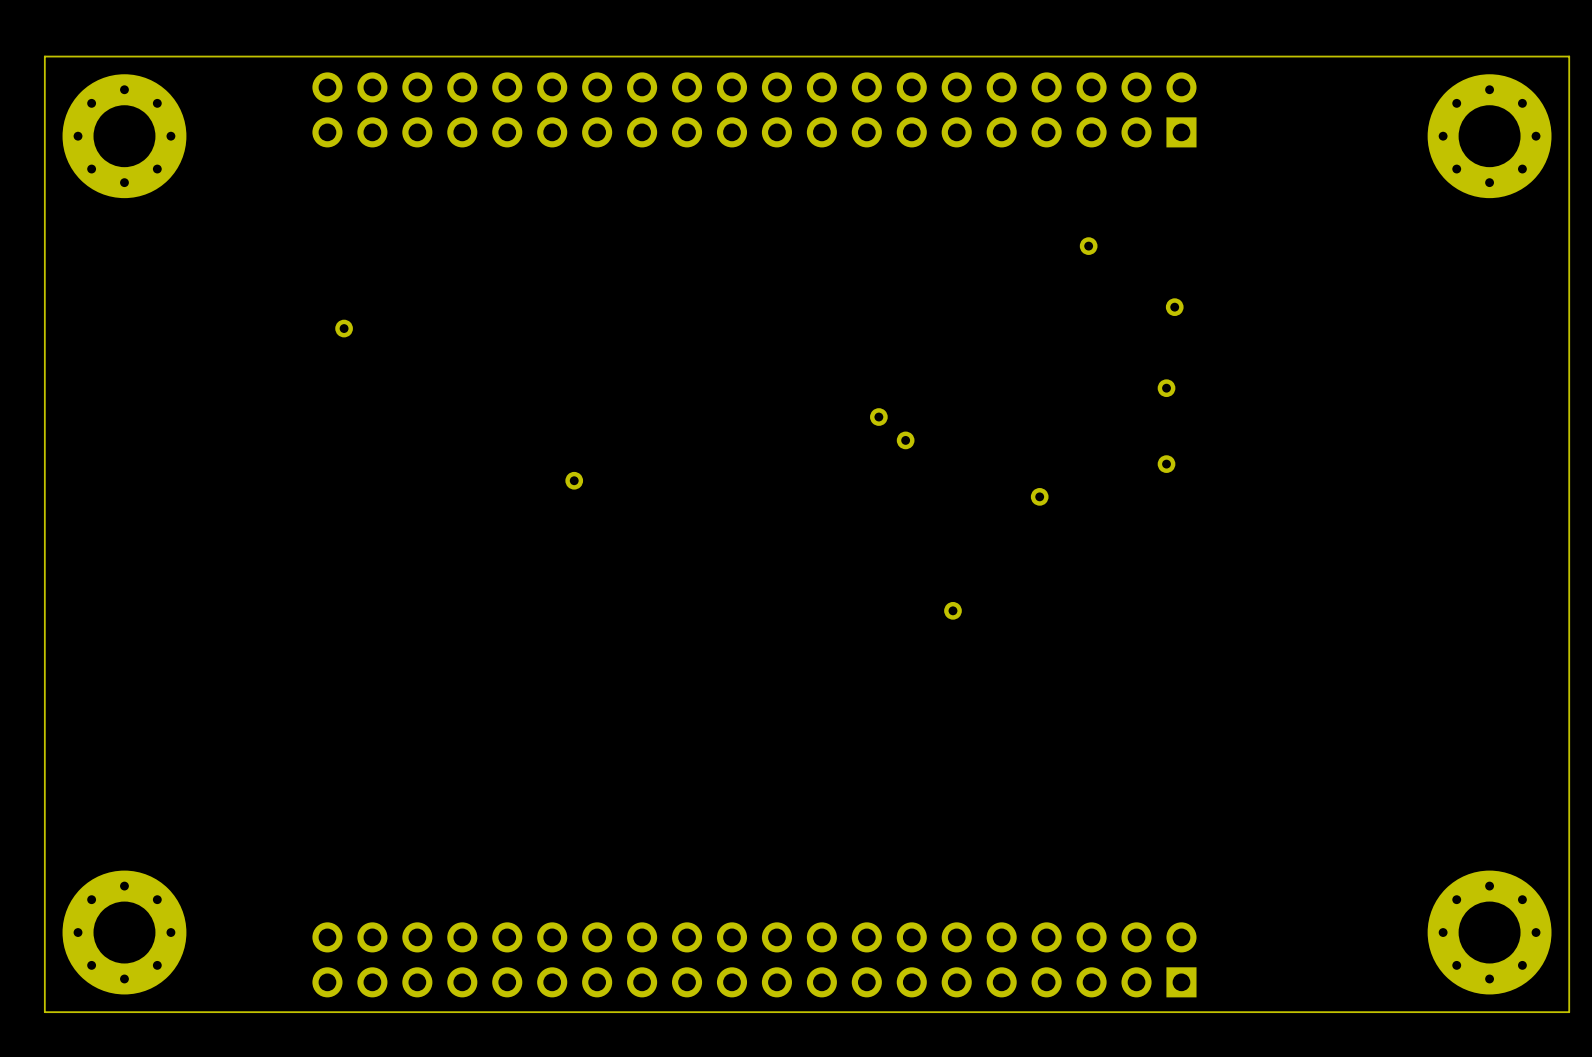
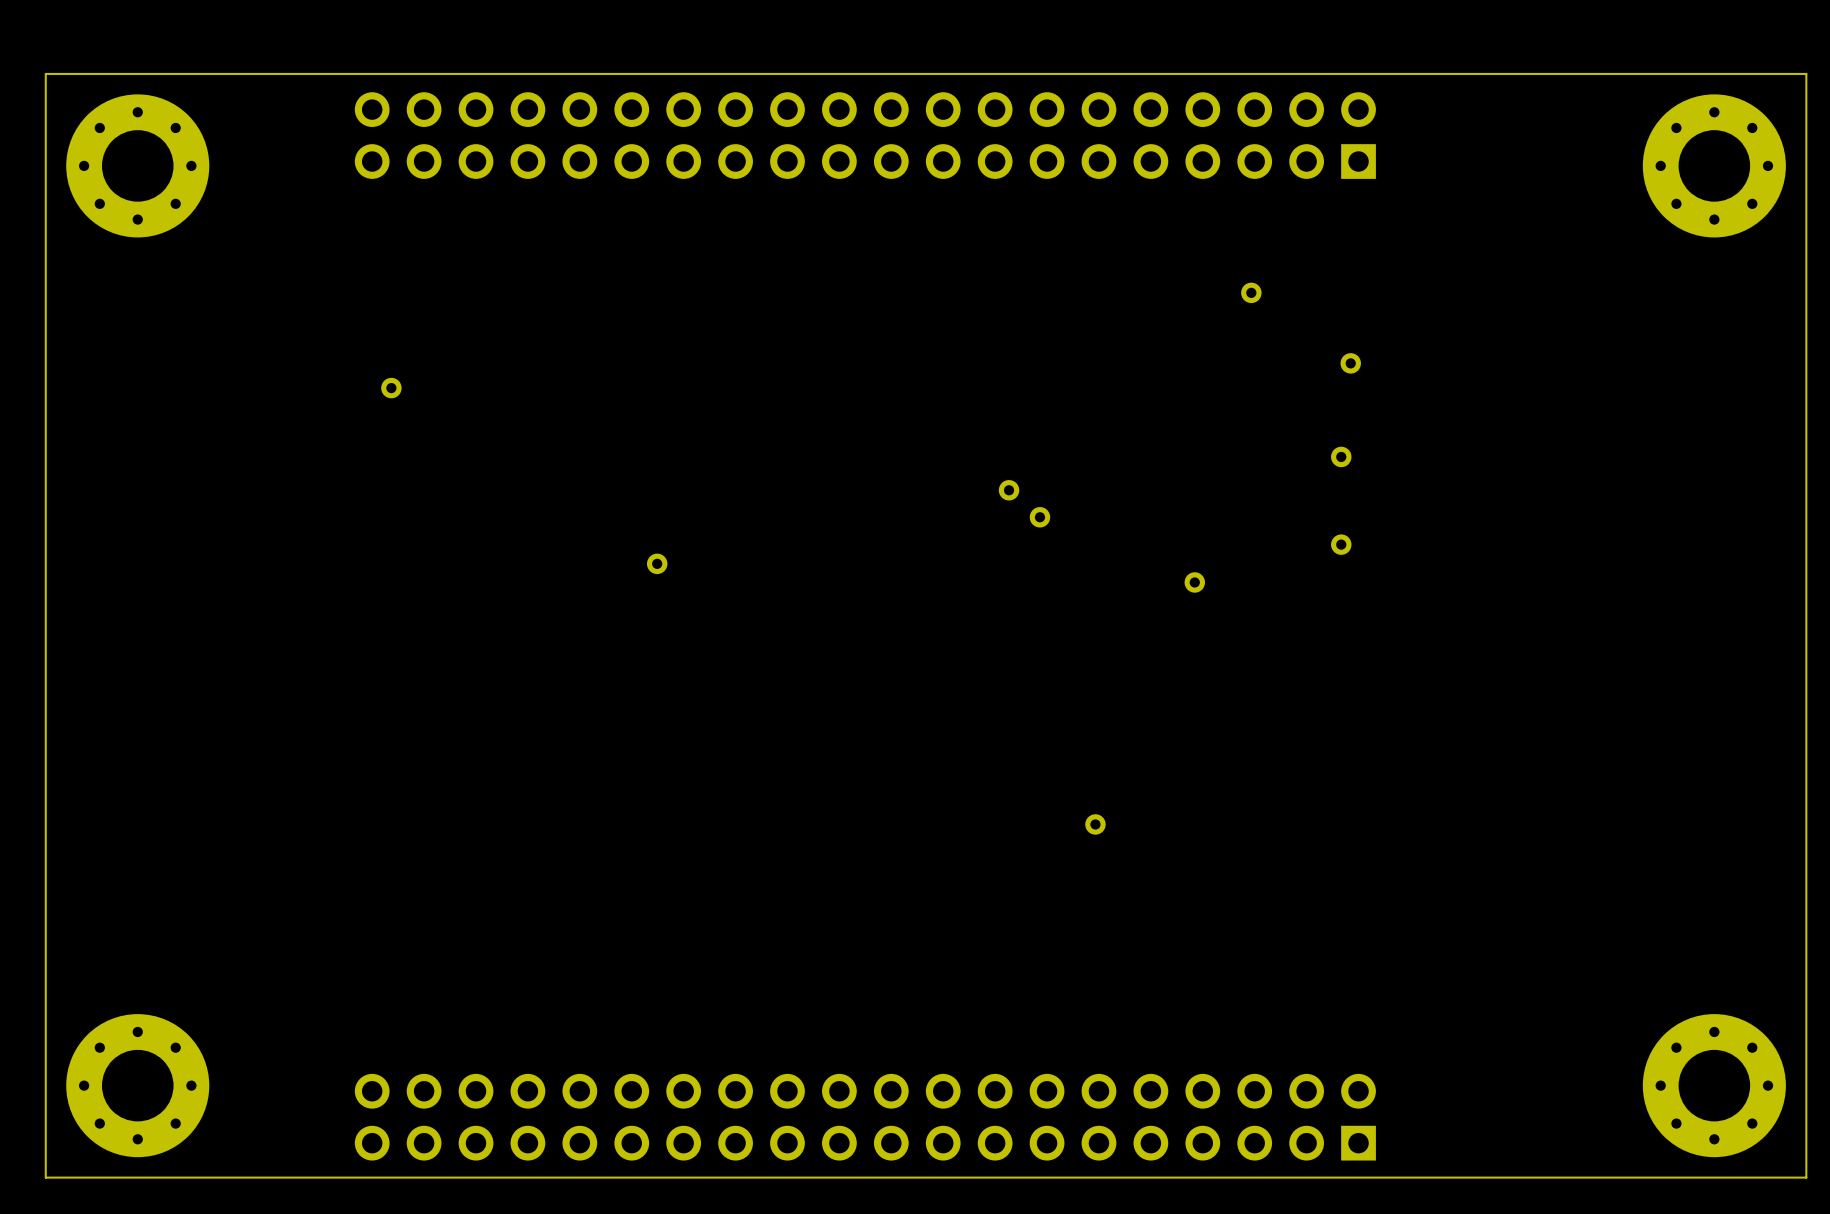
part position: (952, 610) -> (1095, 824)

